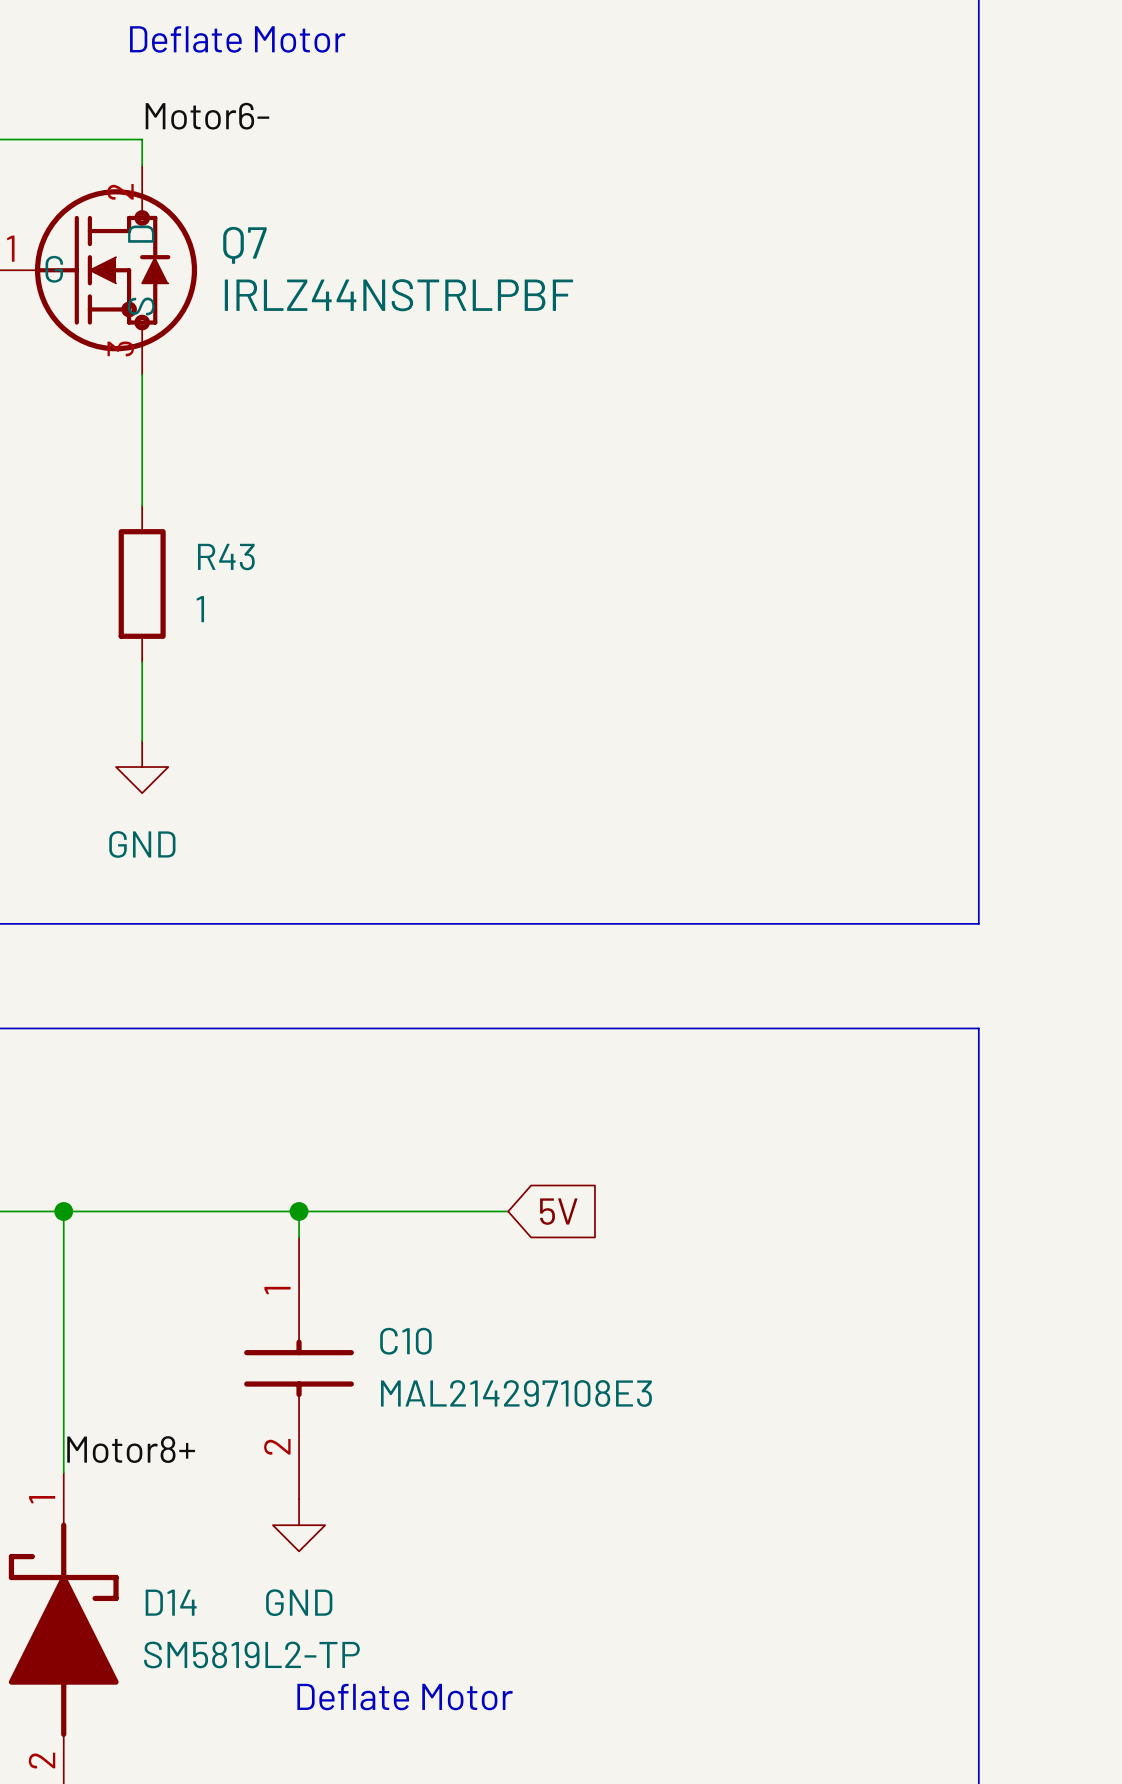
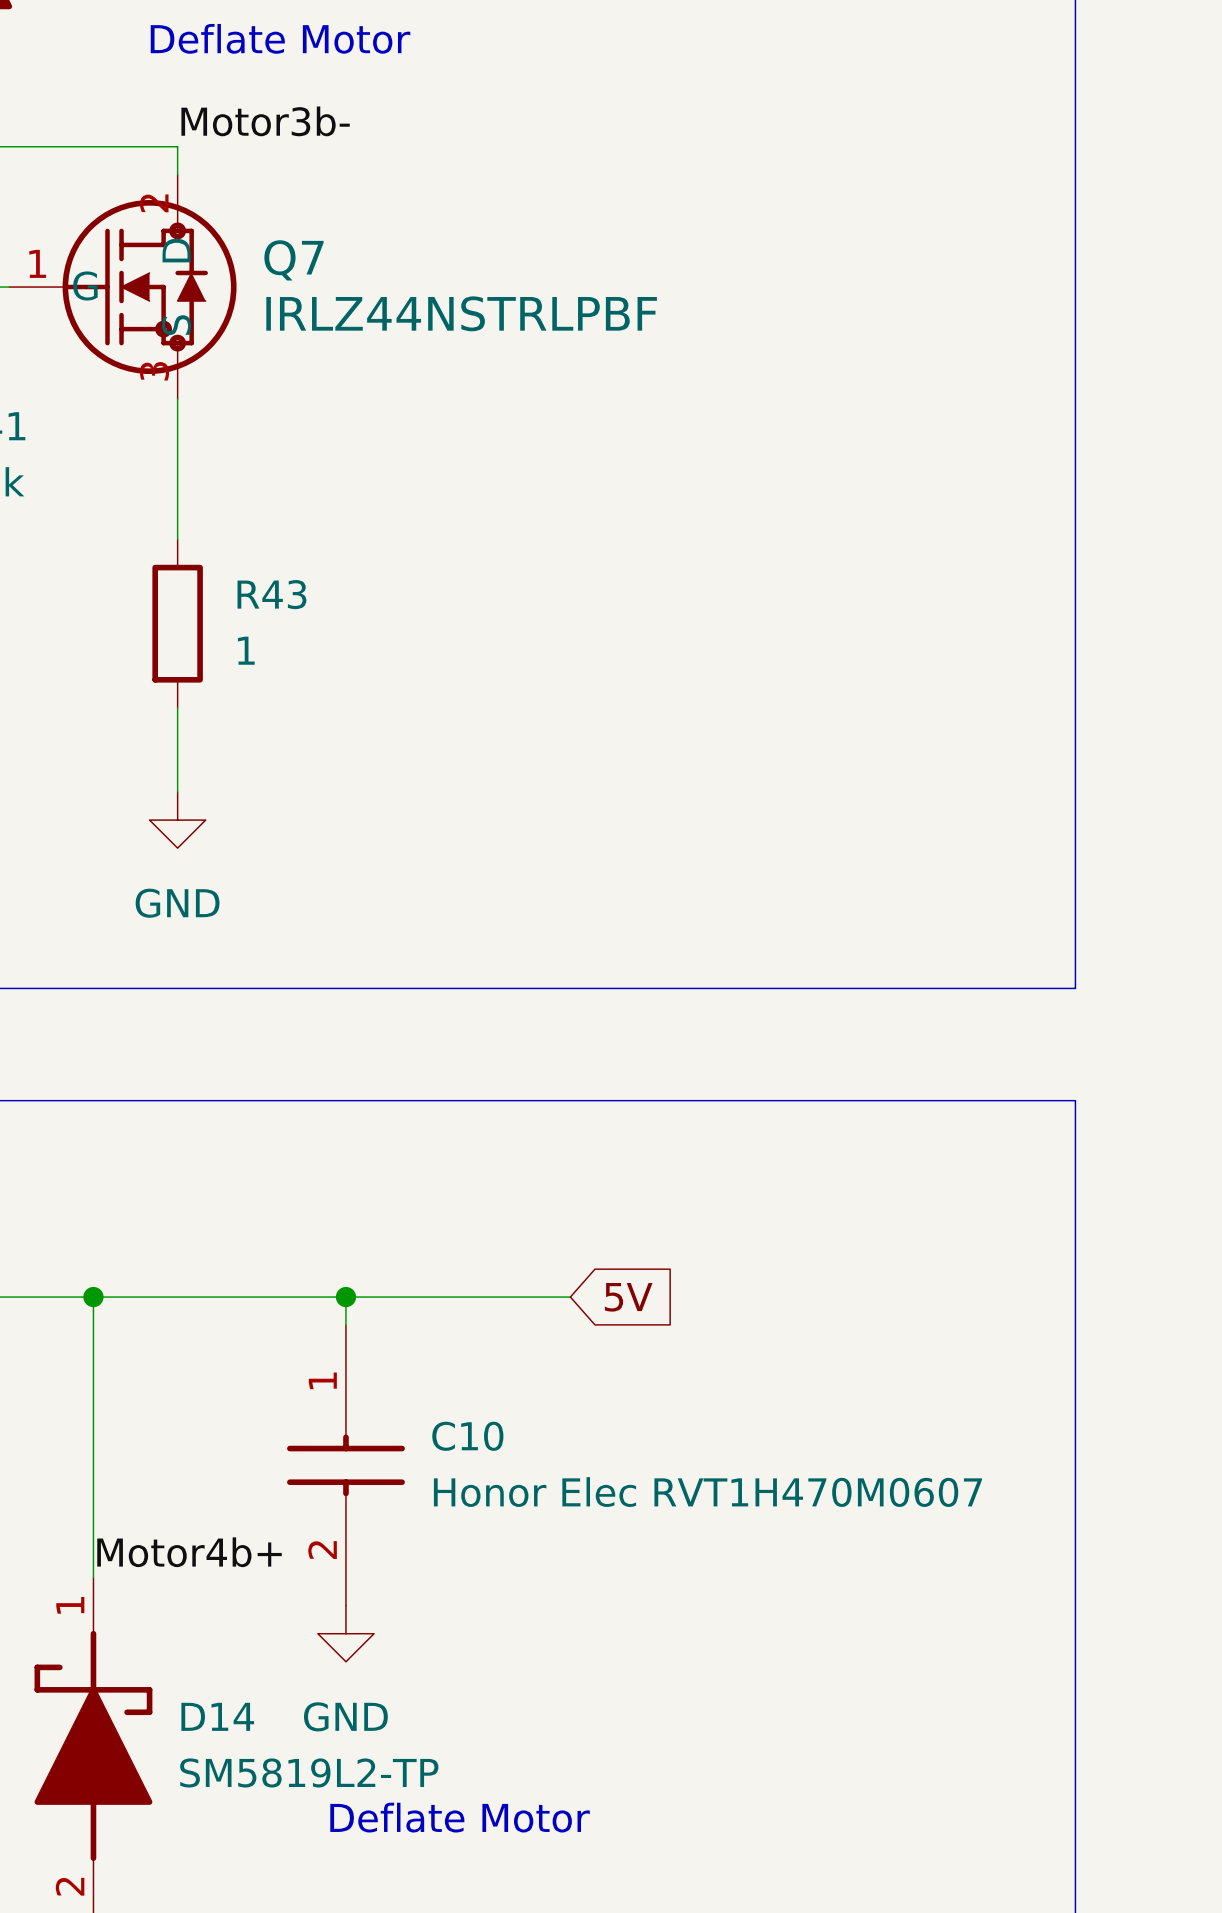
label: Motor6- (207, 116) -> Motor3b- (265, 121)
C10 value: MAL214297108E3 (516, 1393) -> Honor Elec RVT1H470M0607 (707, 1492)
label: Motor8+ (131, 1449) -> Motor4b+ (189, 1552)

